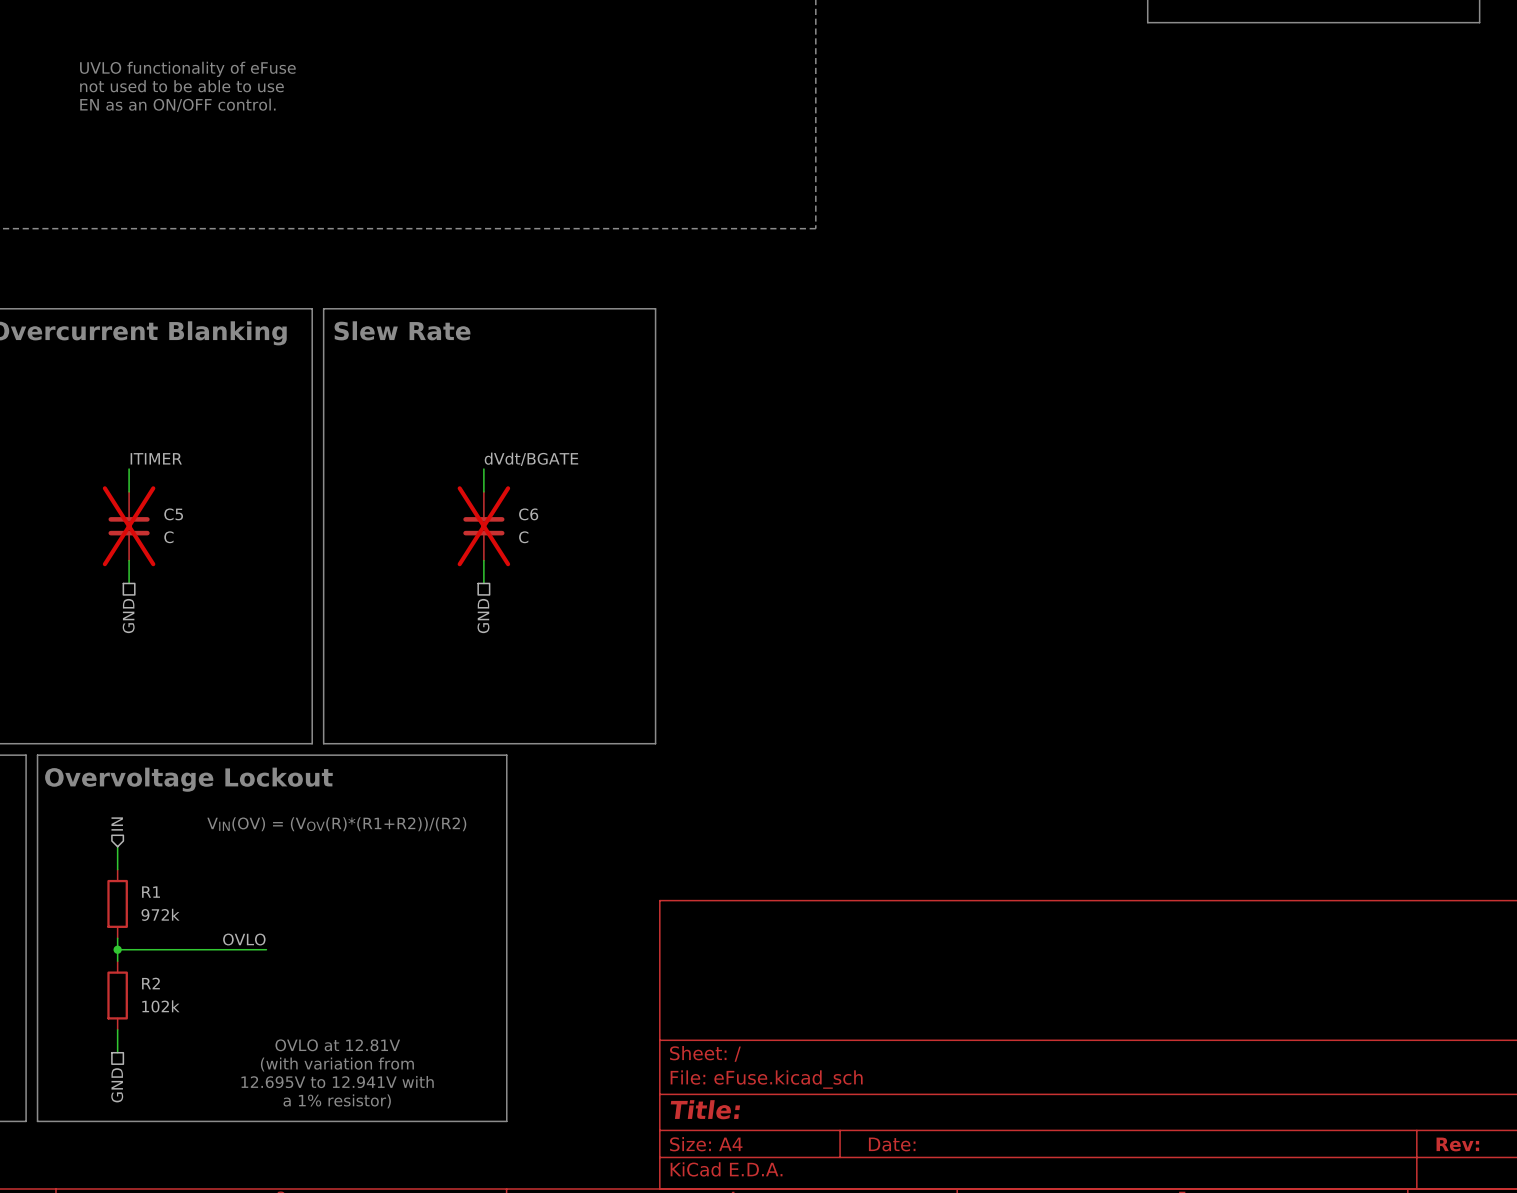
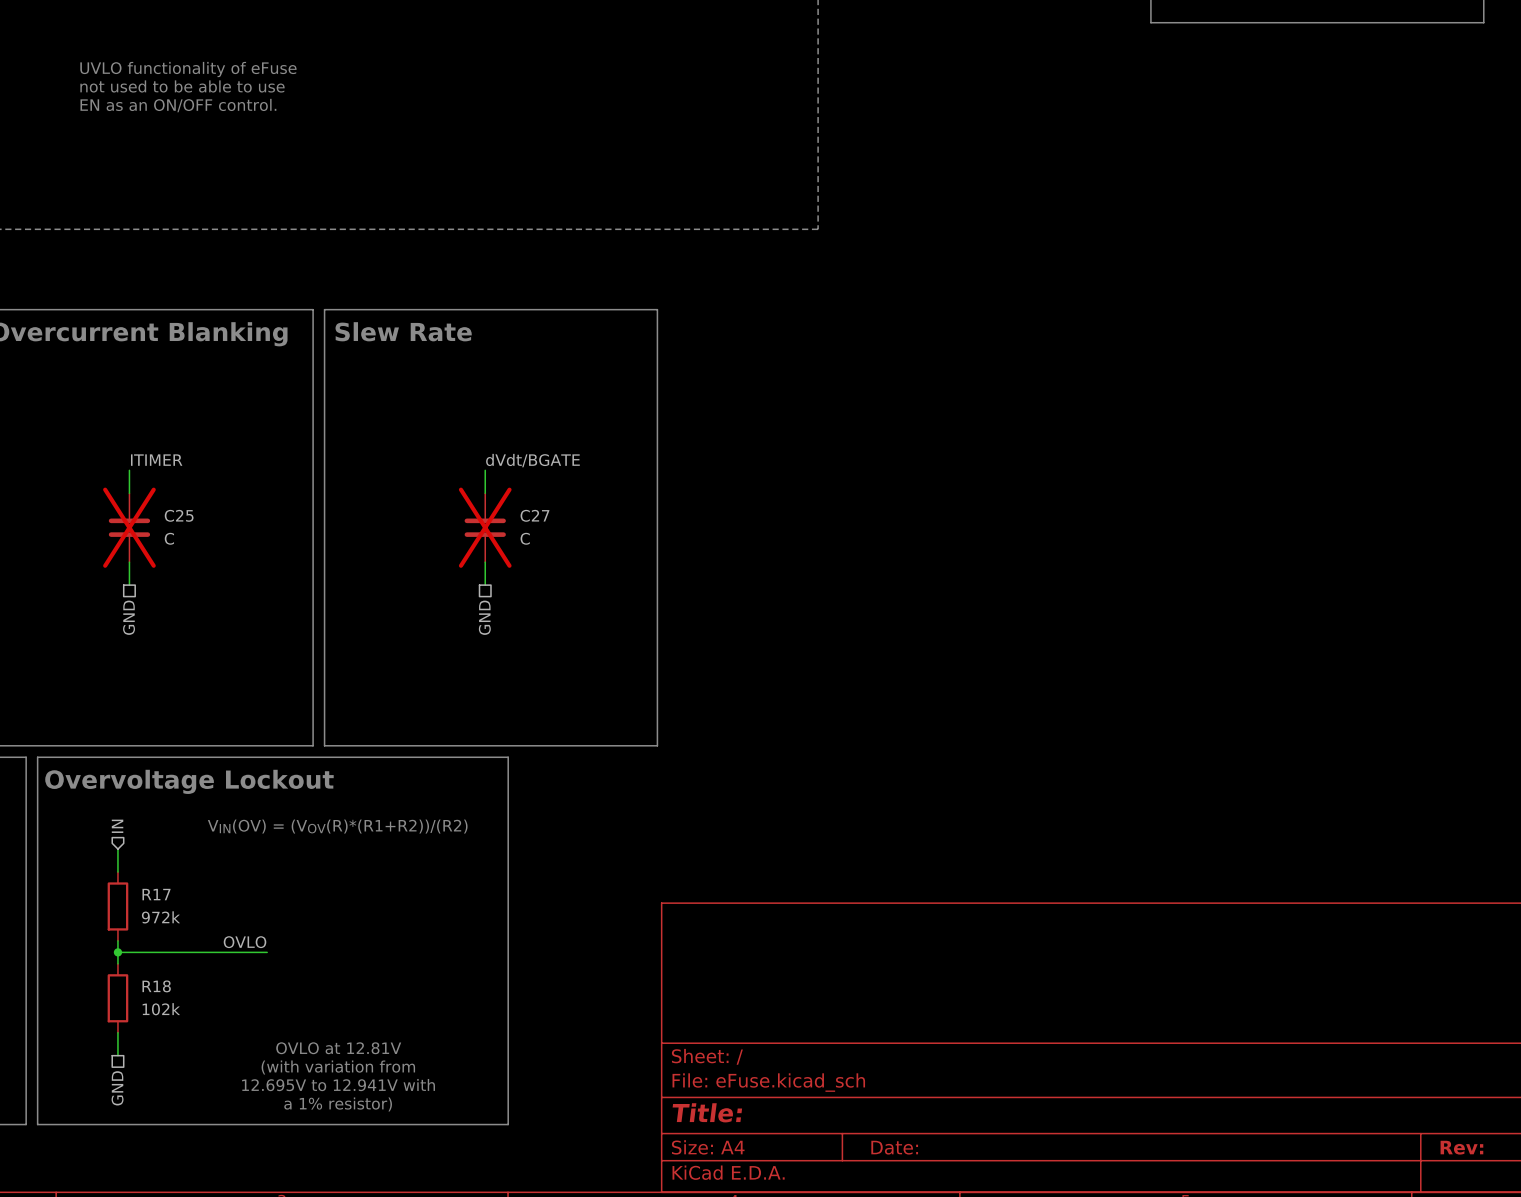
C5 name: C5 (173, 514) -> C25 (179, 515)
C6 name: C6 (528, 514) -> C27 (534, 515)
R1 name: R1 (151, 892) -> R17 (156, 894)
R2 name: R2 (150, 983) -> R18 (156, 986)

